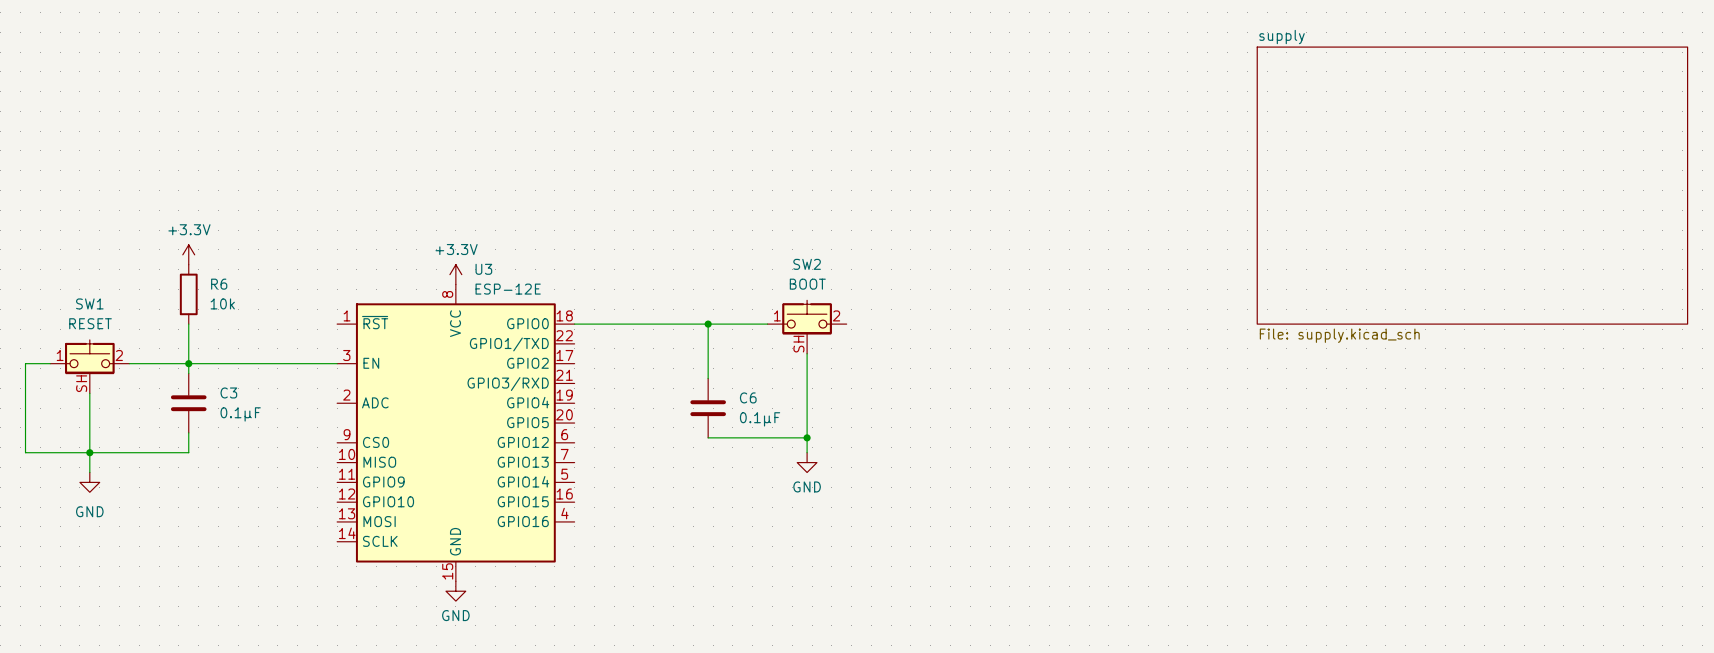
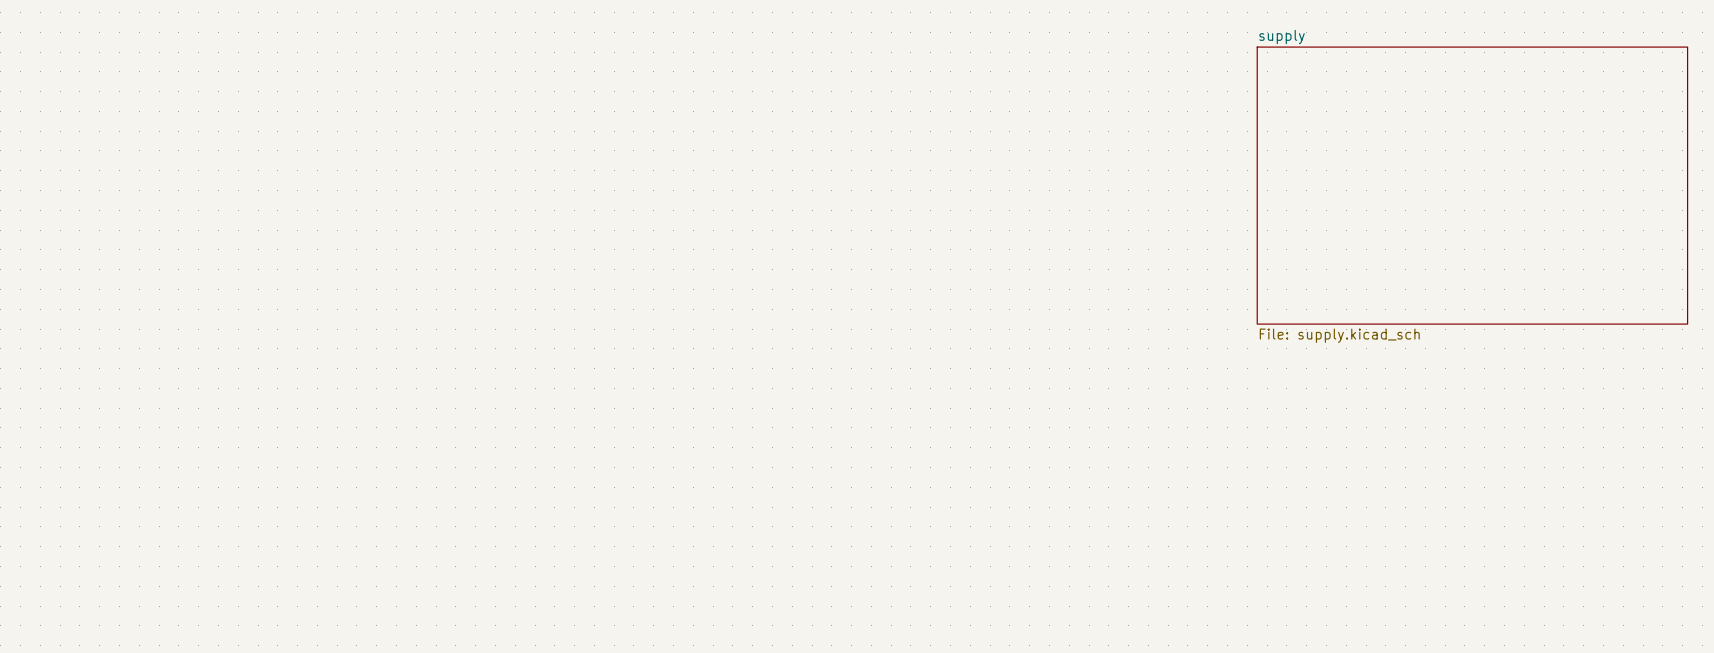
power symbol: +3.3V (188, 254) -> none
power symbol: +3.3V (455, 274) -> none
R6: 10k (188, 294) -> none
wire: (188, 324) (188, 373) -> none
wire: (574, 324) (767, 324) -> none
wire: (708, 324) (708, 378) -> none
junction: (708, 324) -> none
SW2: BOOT (807, 327) -> none
wire: (807, 353) (807, 452) -> none
wire: (50, 363) (25, 363) (25, 452) (188, 452) (188, 432) -> none
wire: (129, 363) (337, 363) -> none
junction: (188, 363) -> none
SW1: RESET (89, 366) -> none
wire: (89, 393) (89, 472) -> none
C3: 0.1µF (188, 403) -> none
C6: 0.1µF (708, 408) -> none
U3: ESP-12E (455, 432) -> none
wire: (708, 437) (807, 437) -> none
junction: (807, 437) -> none
junction: (89, 452) -> none
power symbol: GND (807, 462) -> none
power symbol: GND (89, 482) -> none
power symbol: GND (455, 591) -> none

